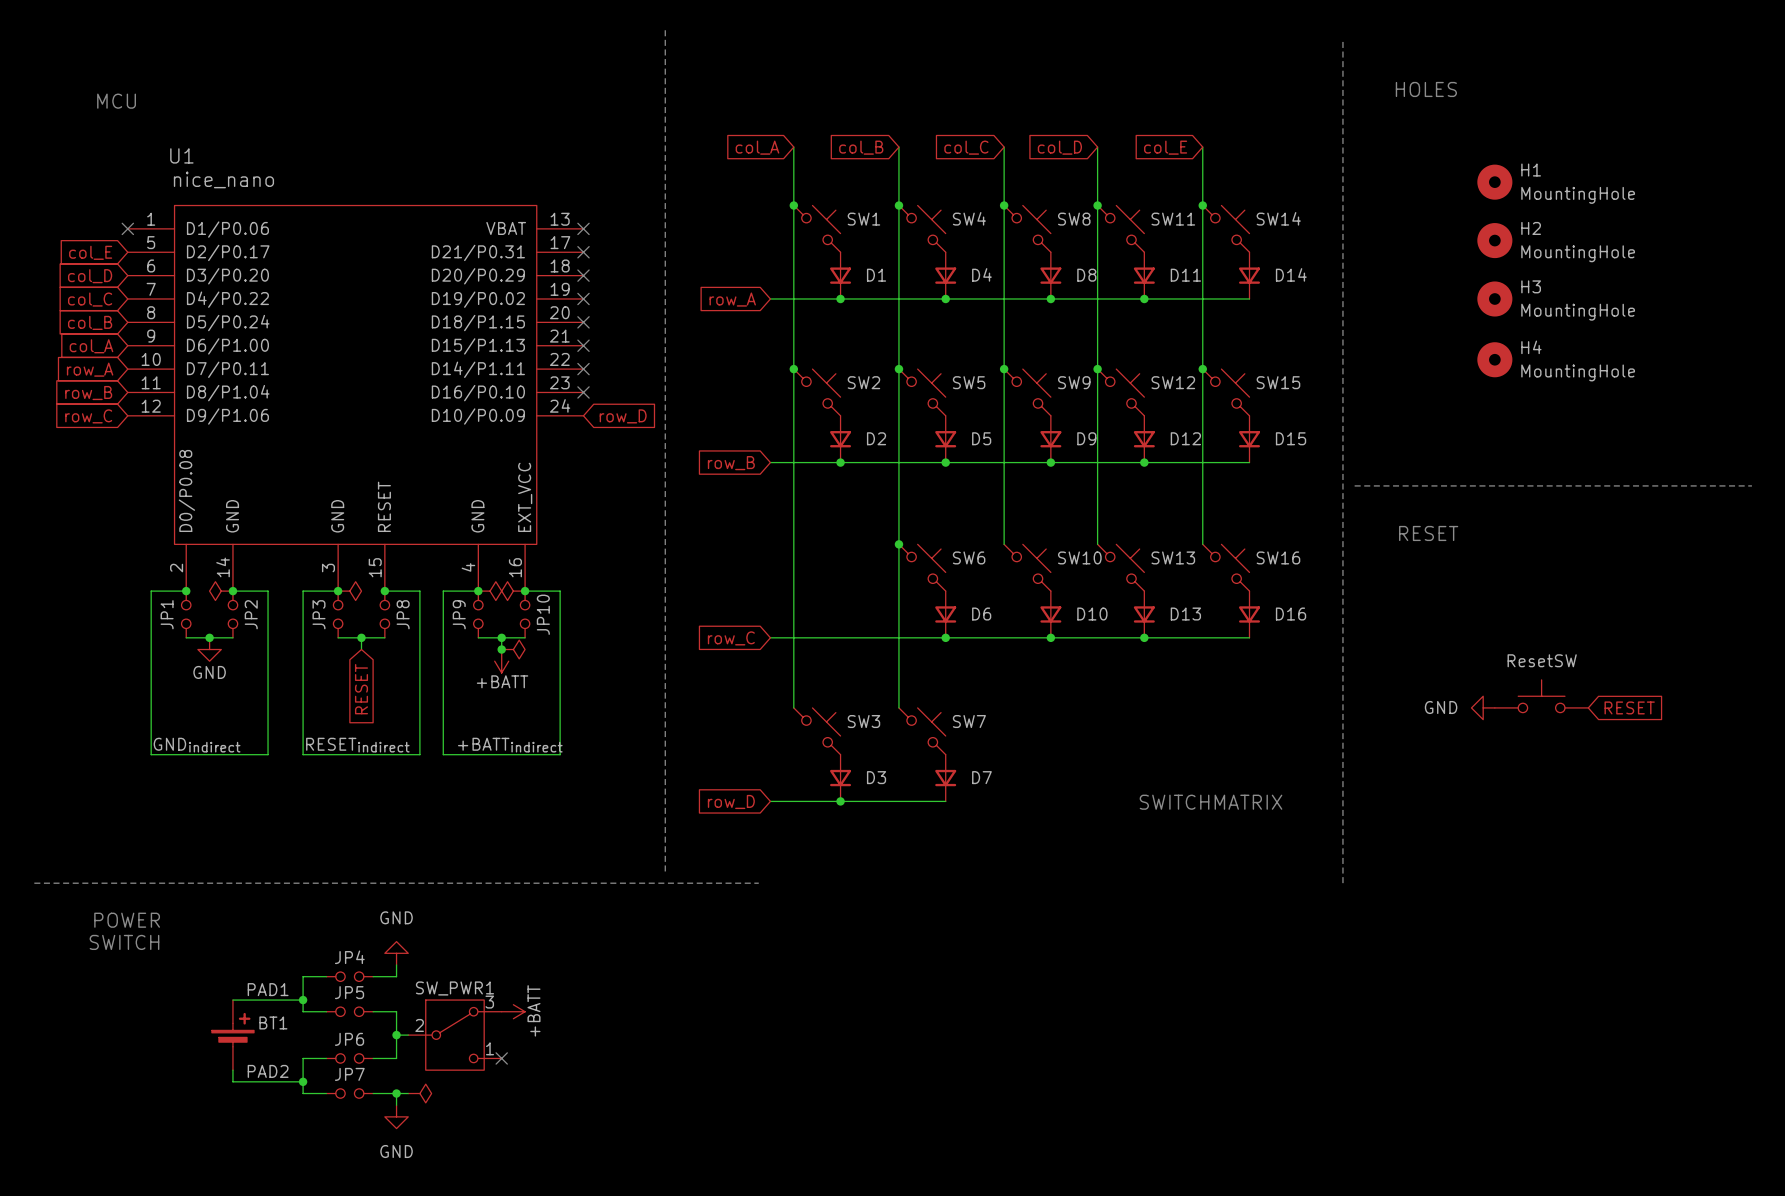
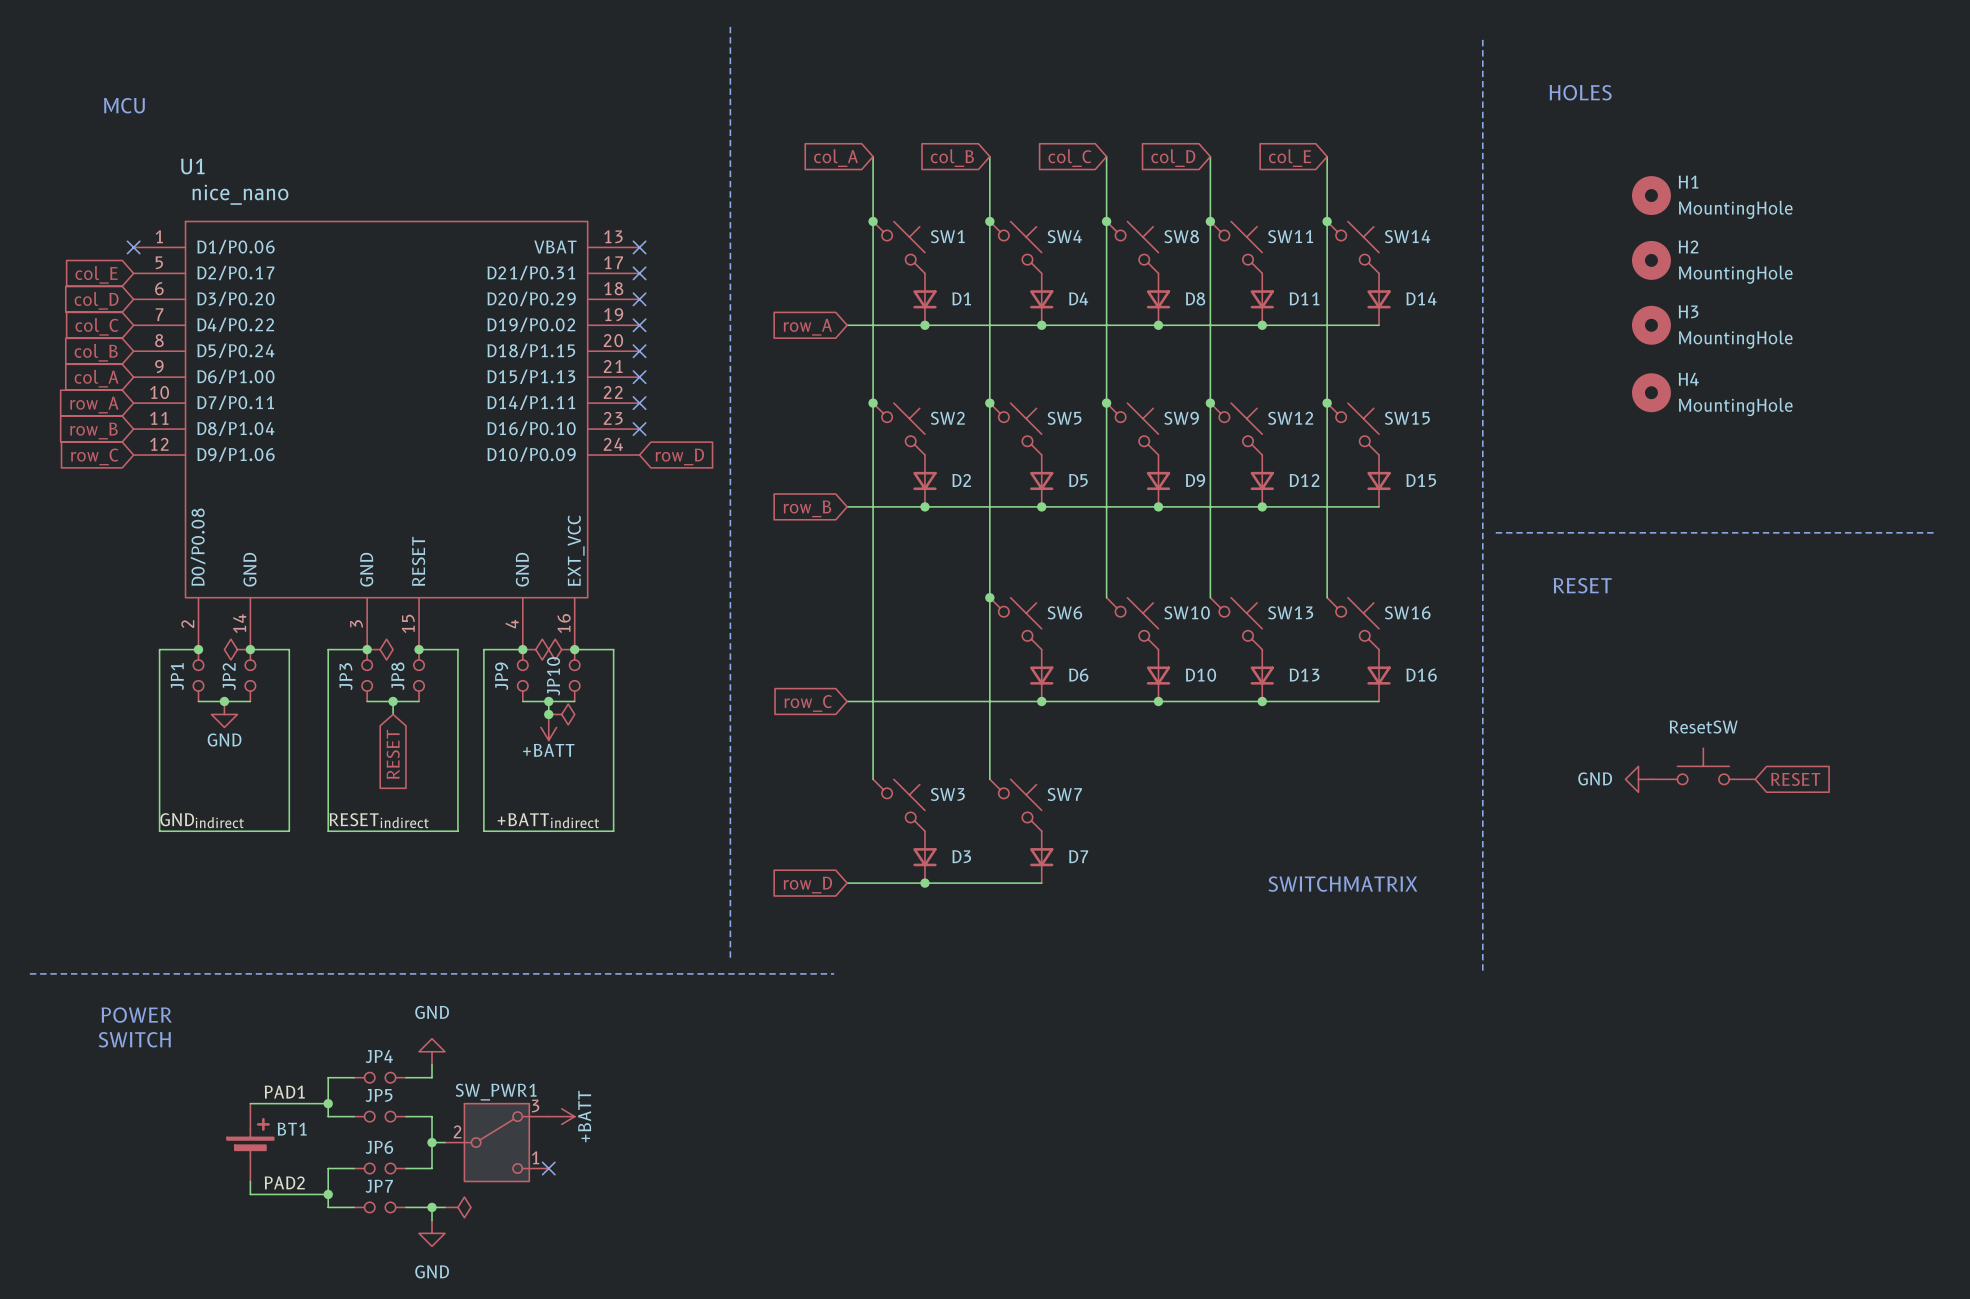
JP2 name position: JP2 (251, 614) -> JP2 (229, 676)
JP8 name position: JP8 (403, 614) -> JP8 (397, 676)
JP10 name position: JP10 (543, 614) -> JP10 (553, 676)

